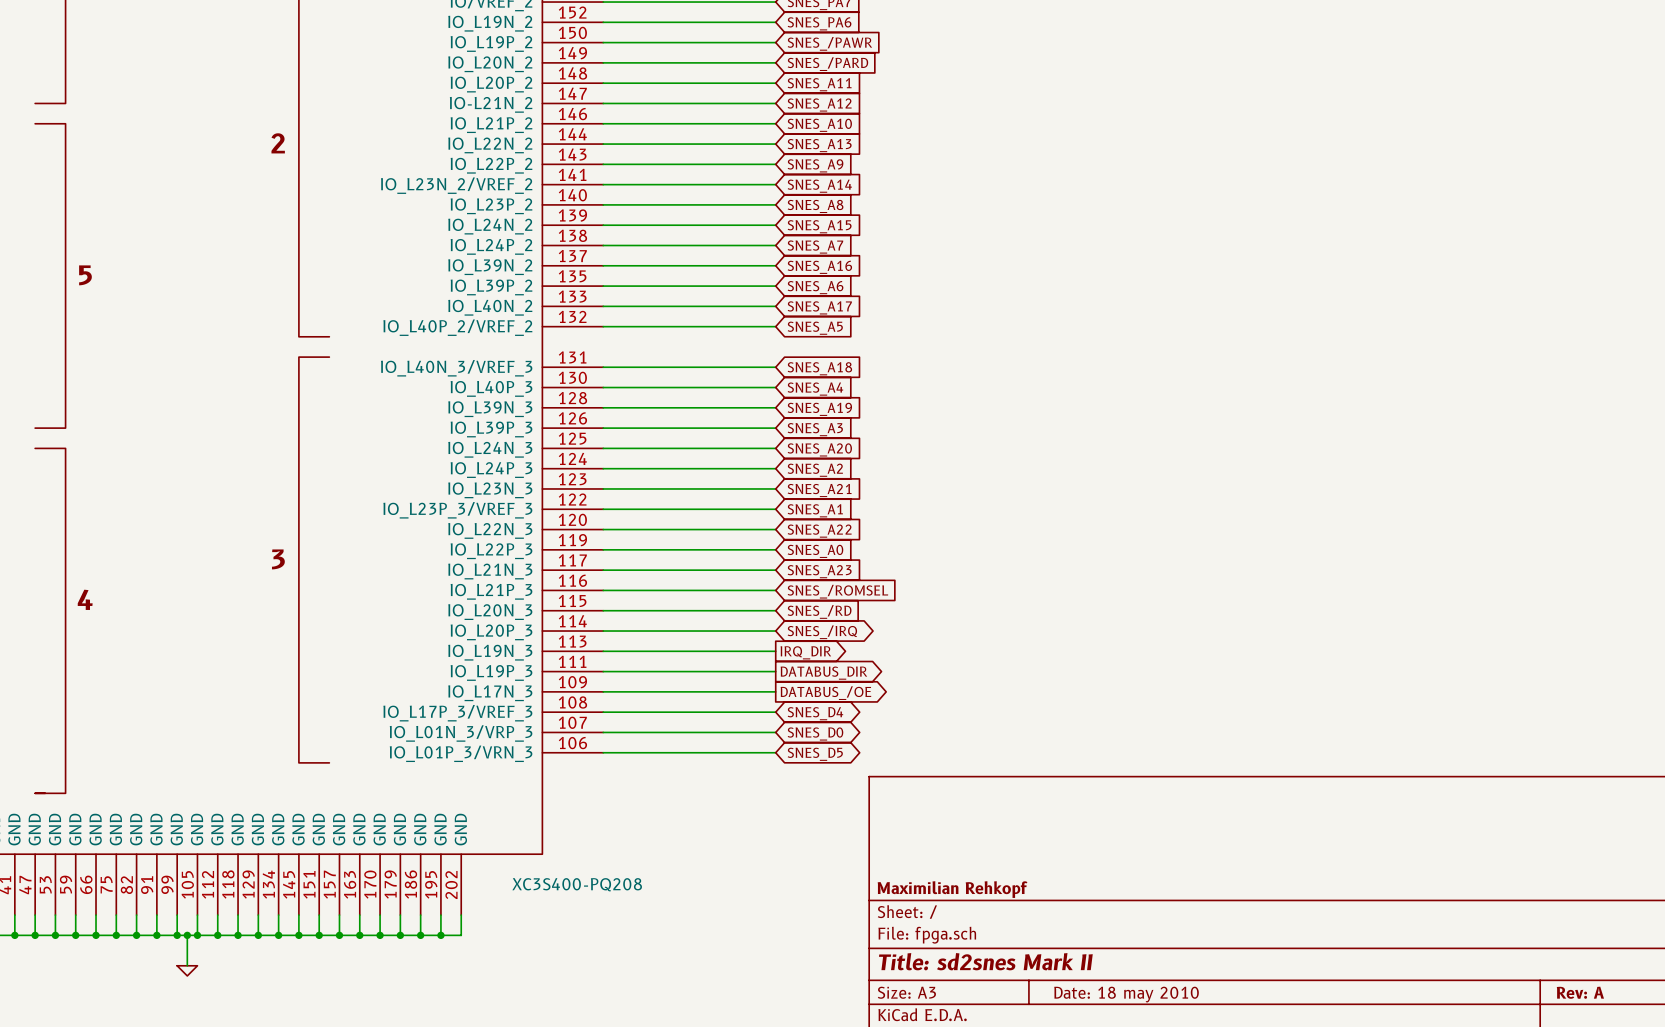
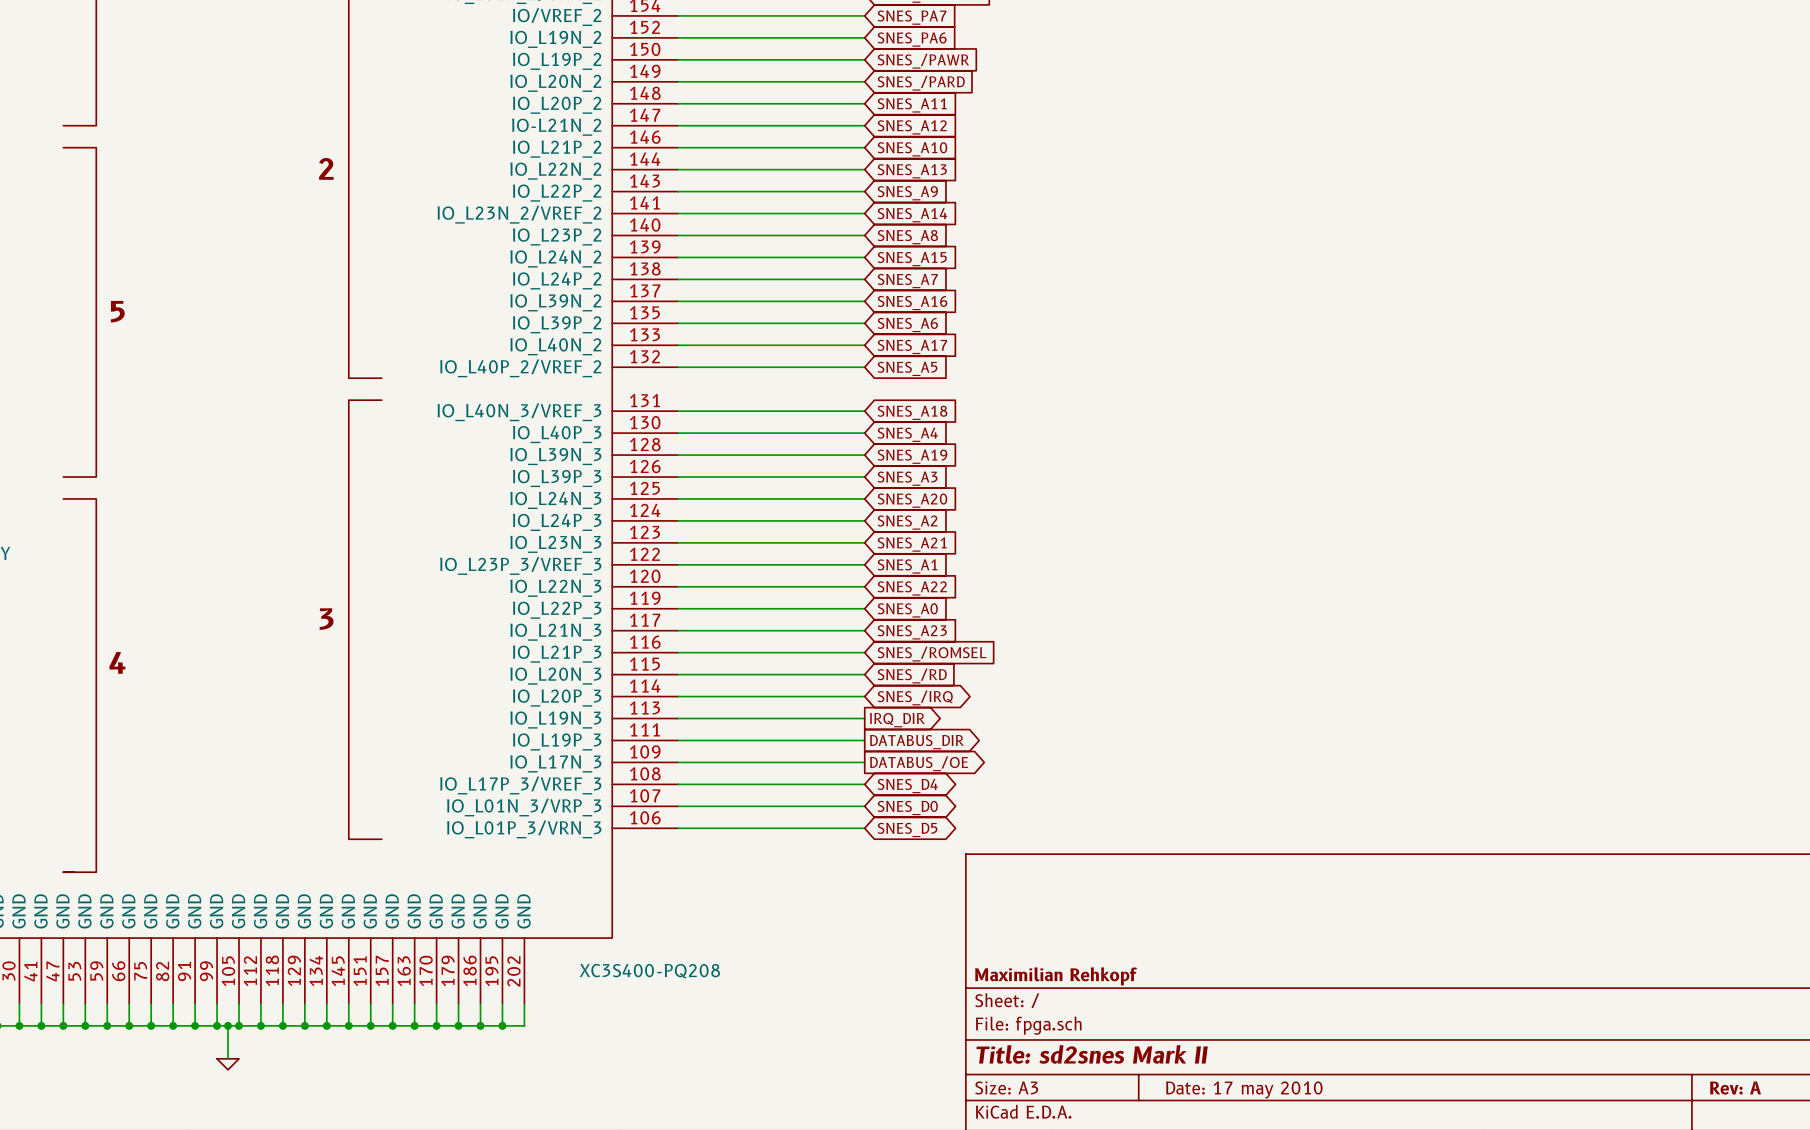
title block: Date: 18 may 2010 (1126, 994) -> Date: 17 may 2010 (1244, 1089)

